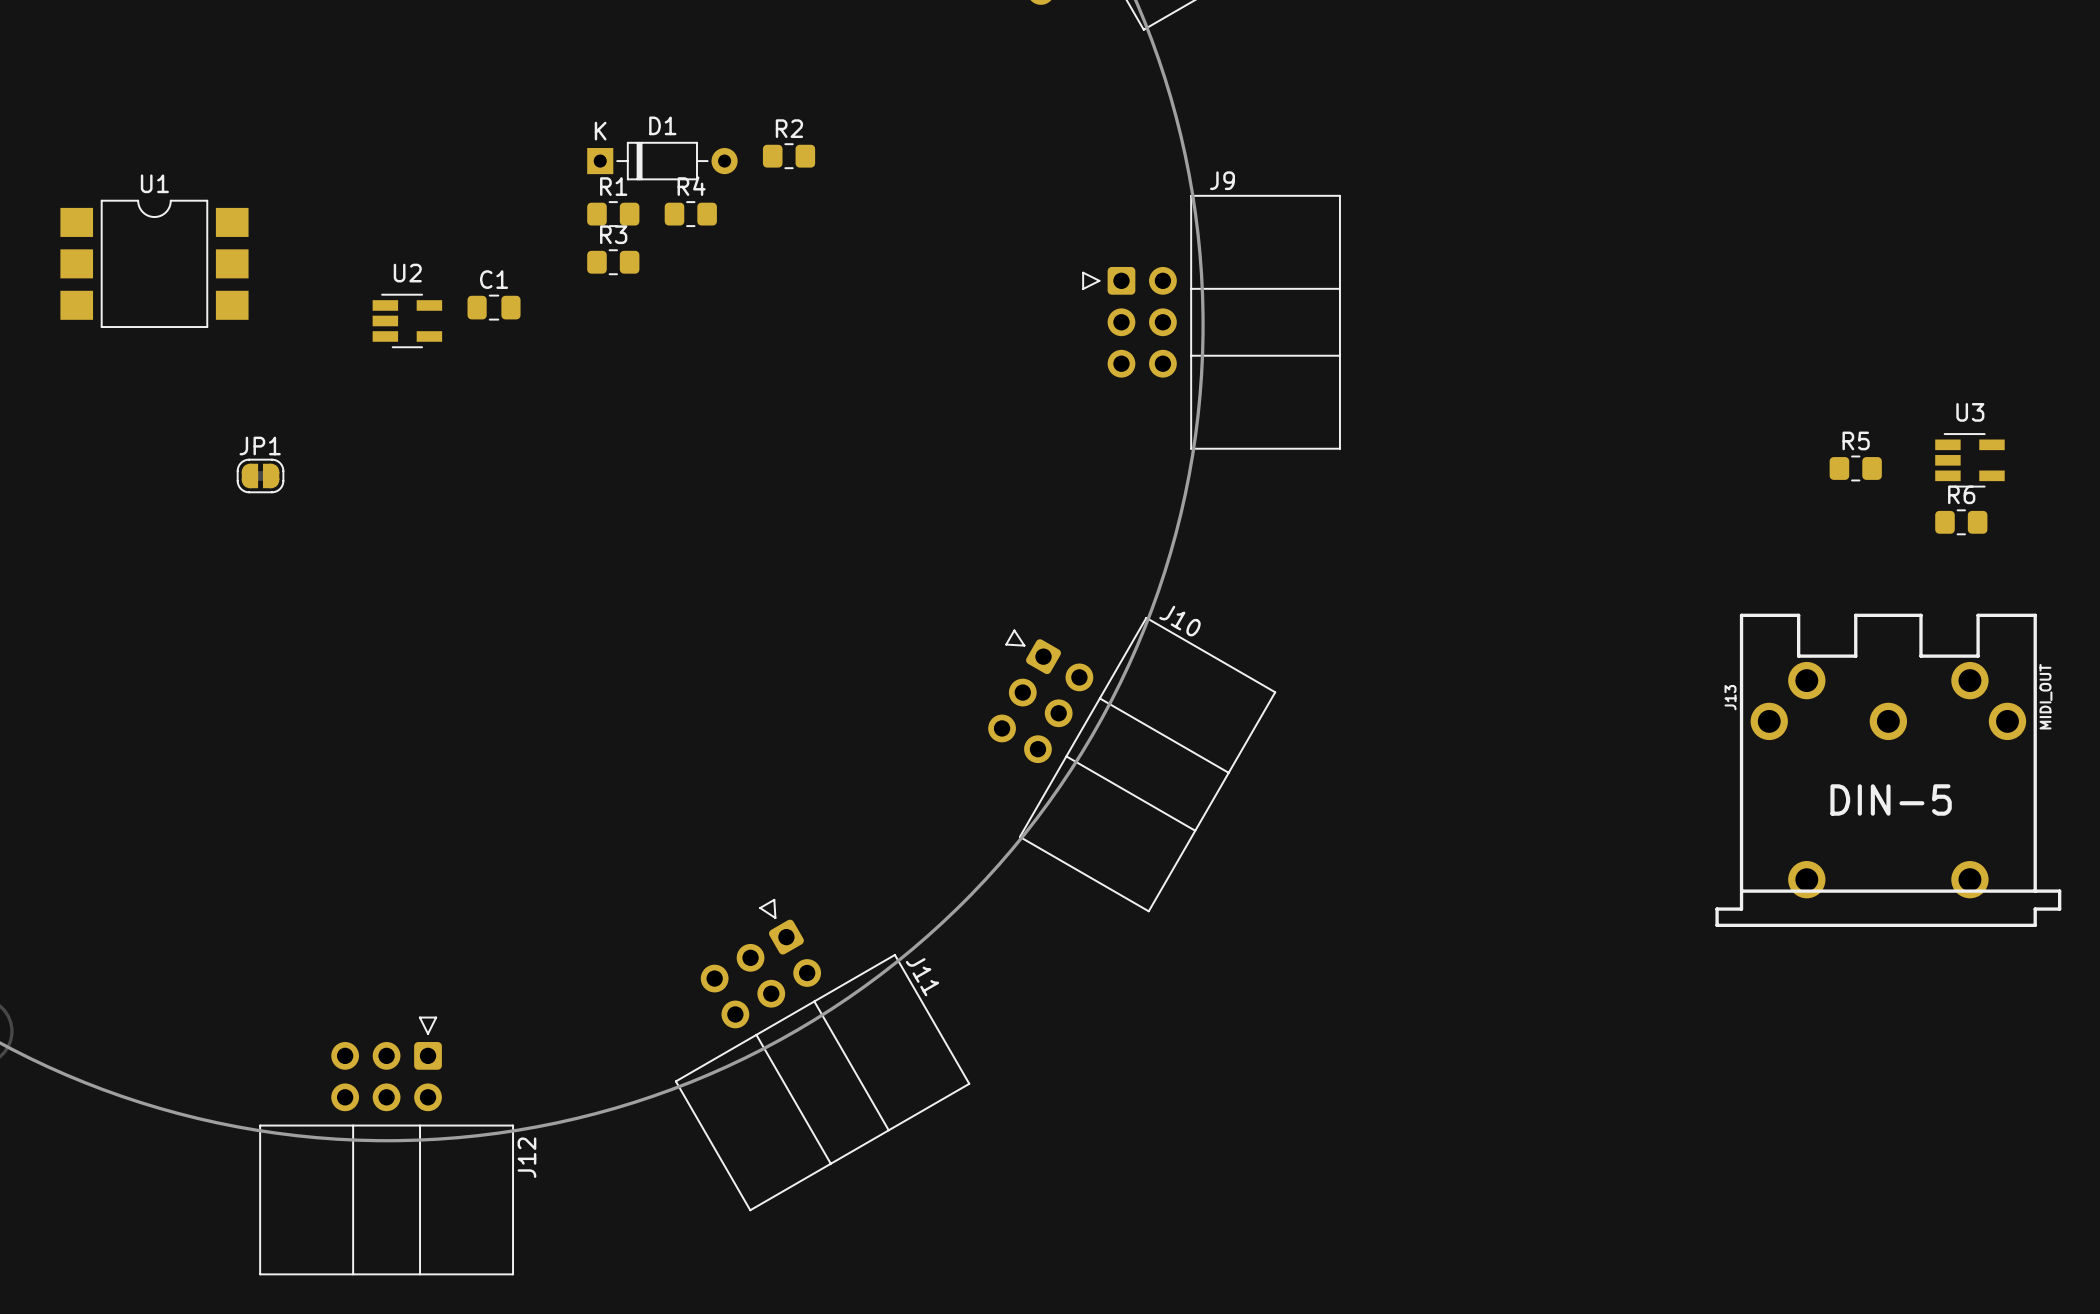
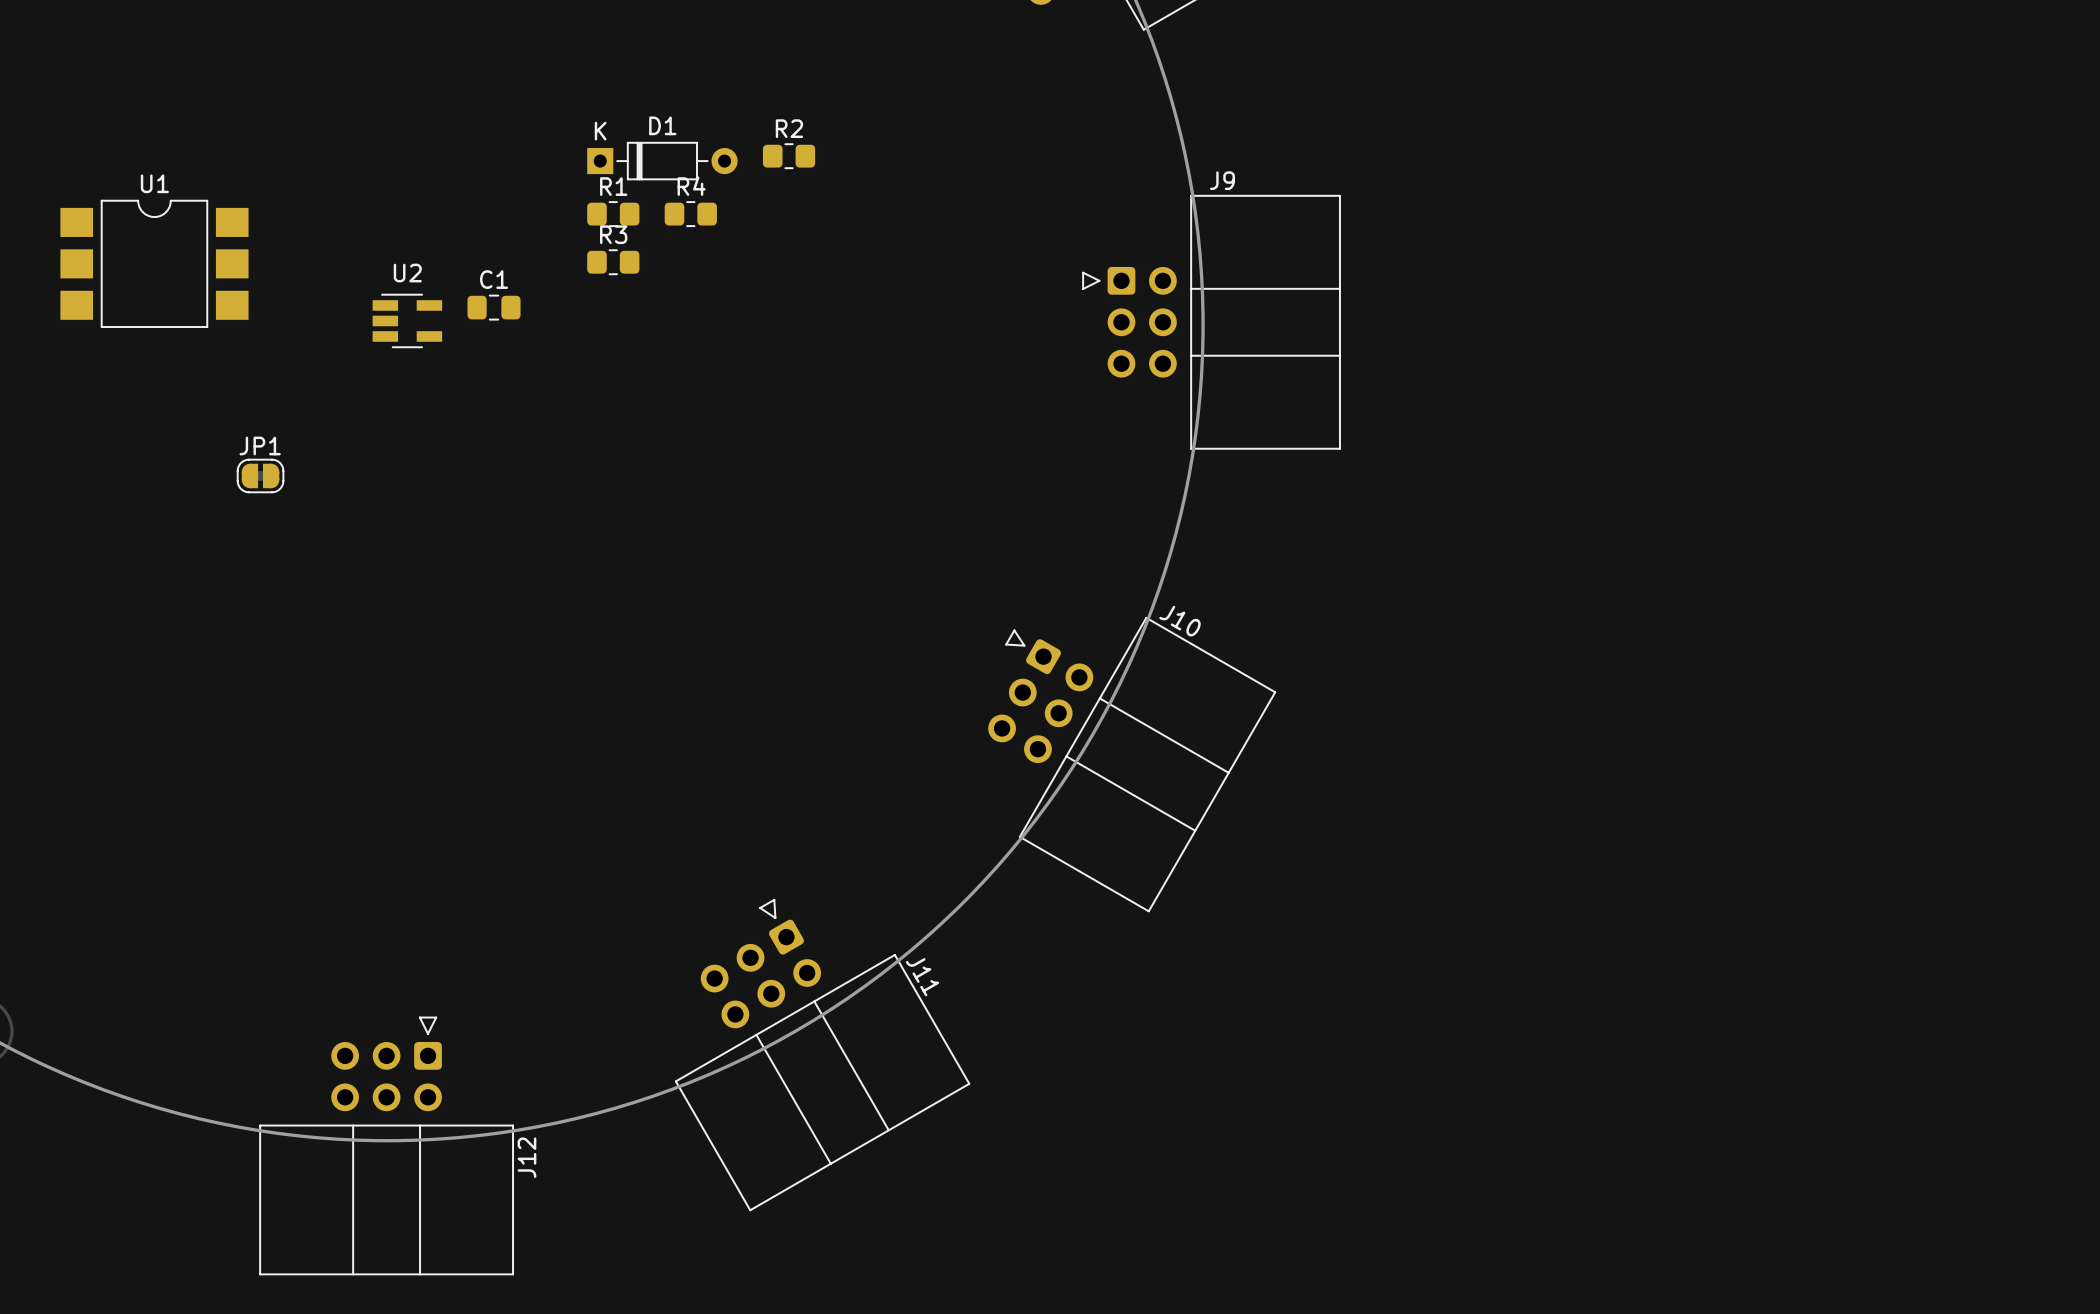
U3: (1969, 460) -> none
R5: (1855, 468) -> none
R6: (1961, 522) -> none
J13: MIDI_OUT (1888, 770) -> none

